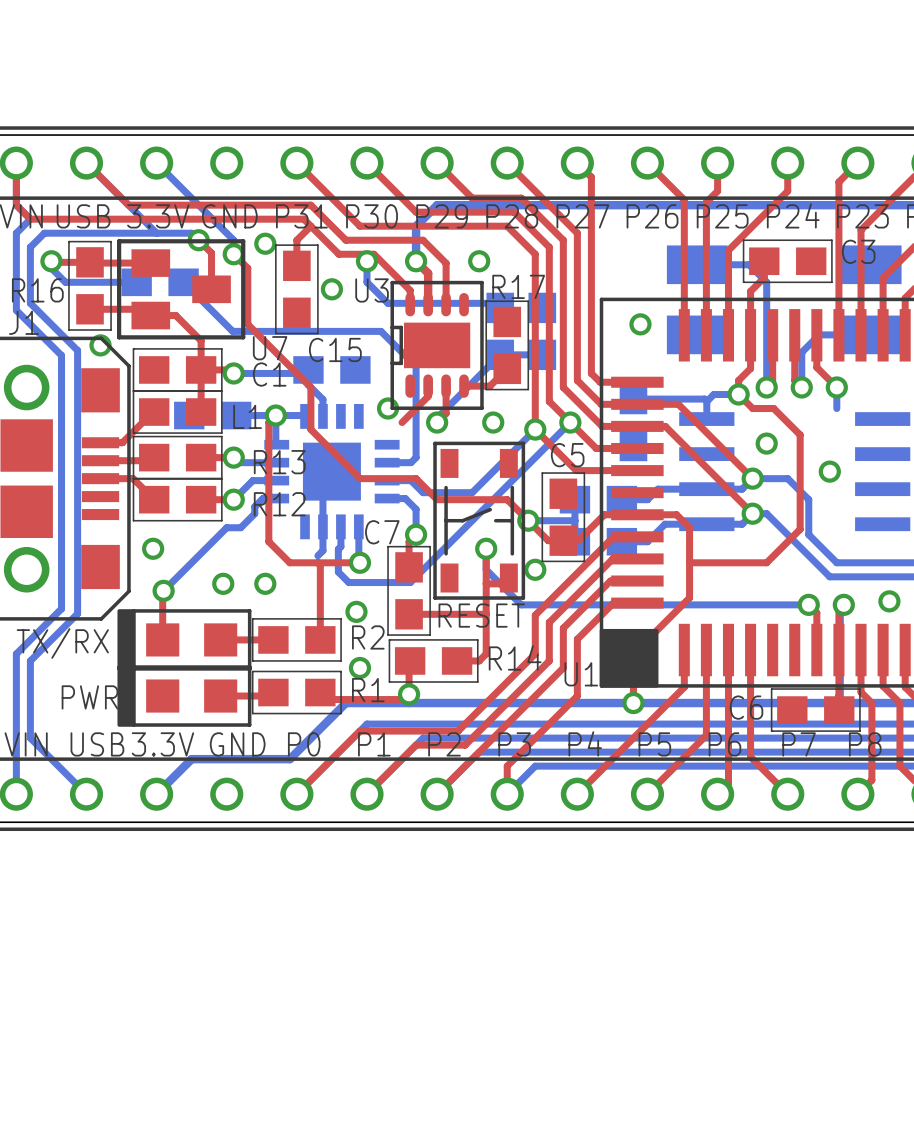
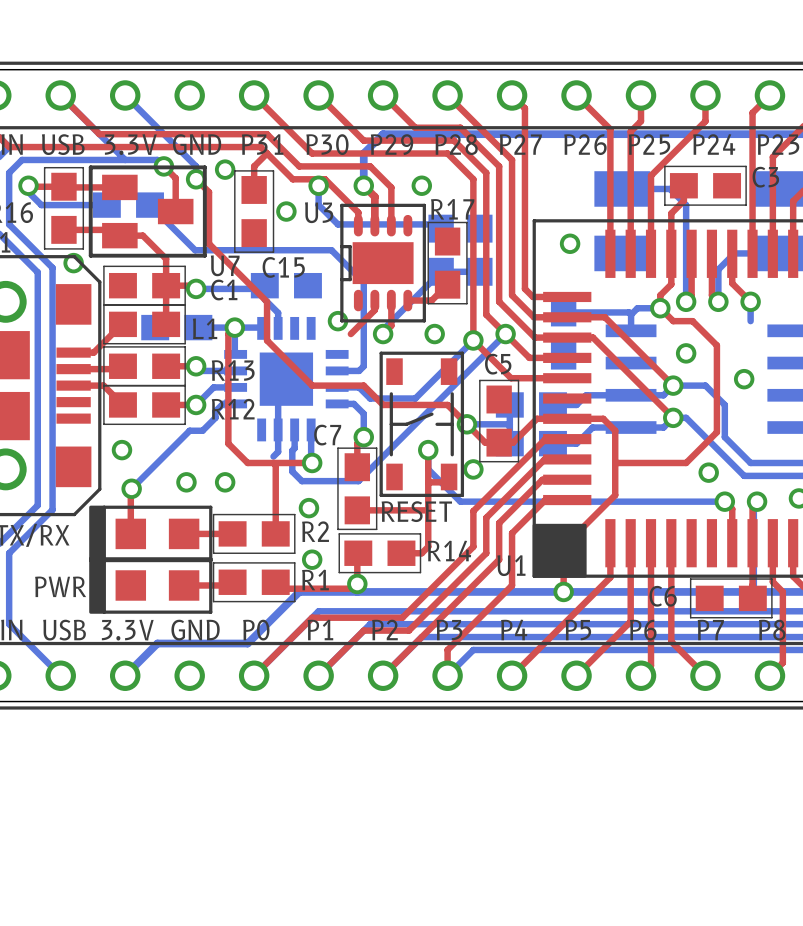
via: none -> (708, 472)

